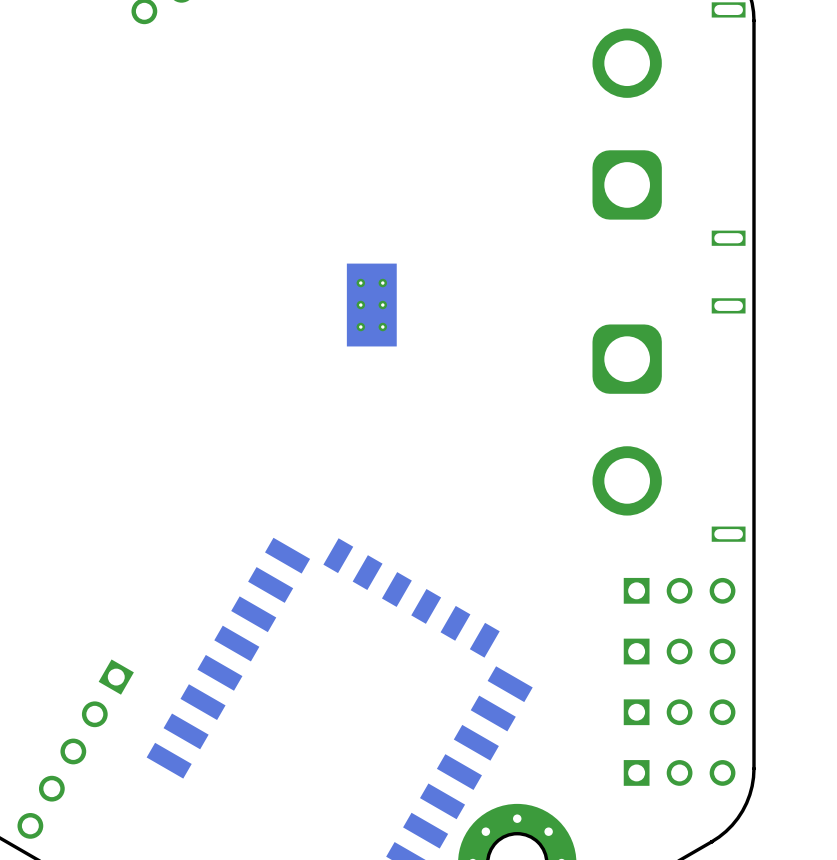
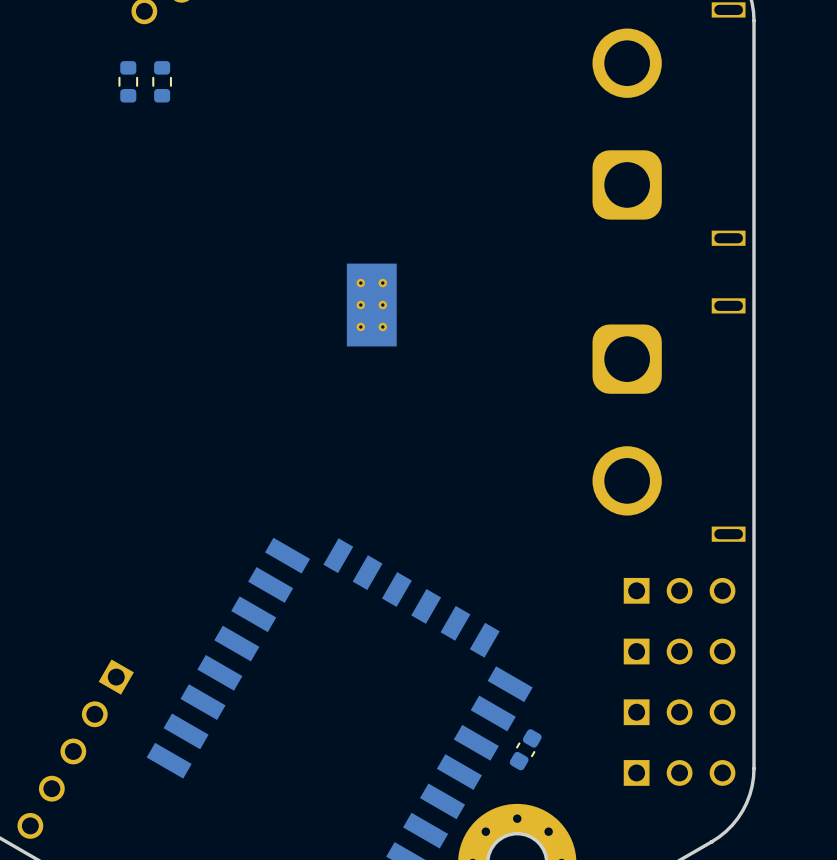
part: none -> (128, 81)
part: none -> (162, 81)
part: none -> (525, 749)

